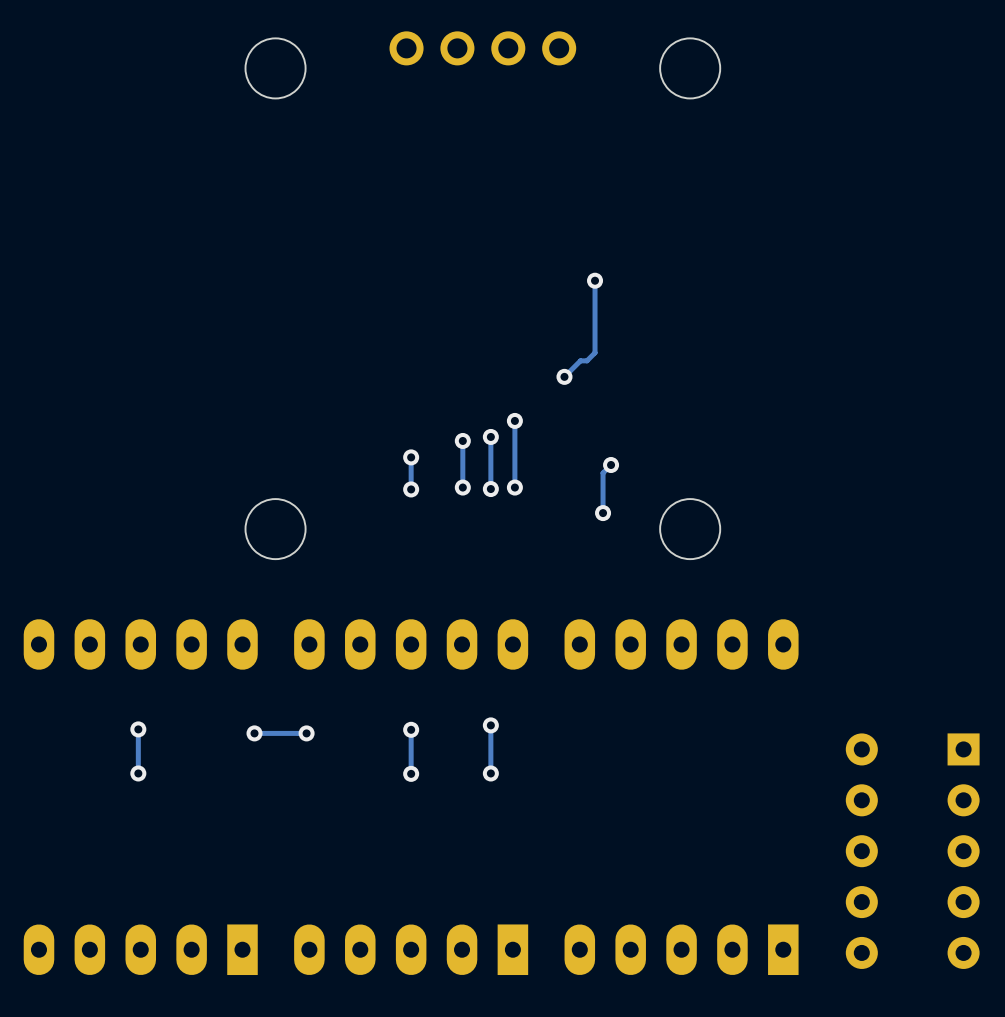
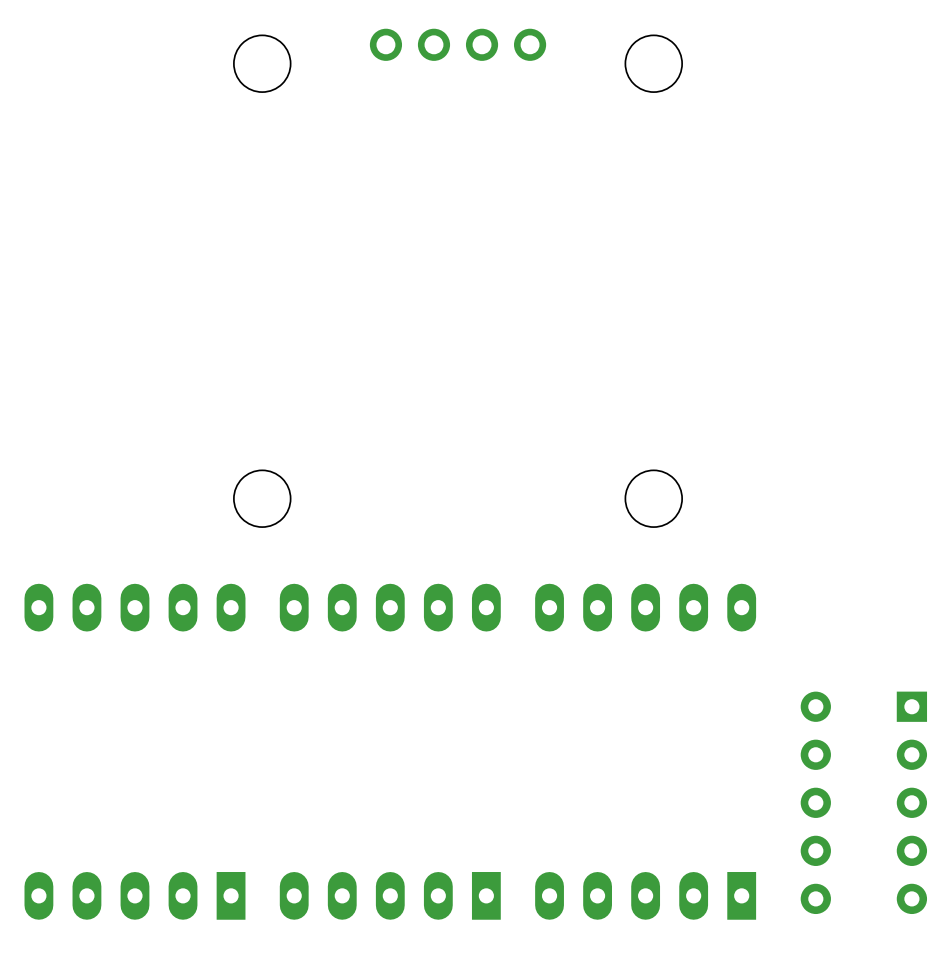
track: (595, 280) (595, 352) (587, 360) (580, 360) (564, 376) -> none
via: (595, 280) -> none
via: (564, 376) -> none
track: (514, 420) (514, 487) -> none
via: (514, 420) -> none
track: (490, 436) (490, 489) -> none
via: (490, 436) -> none
track: (462, 440) (462, 487) -> none
via: (462, 440) -> none
track: (411, 457) (411, 489) -> none
via: (411, 457) -> none
track: (611, 465) (603, 473) (603, 513) -> none
via: (611, 465) -> none
via: (462, 487) -> none
via: (514, 487) -> none
via: (411, 489) -> none
via: (490, 489) -> none
via: (603, 513) -> none
track: (490, 725) (490, 773) -> none
via: (490, 725) -> none
track: (138, 729) (138, 773) -> none
via: (138, 729) -> none
track: (411, 729) (411, 773) -> none
via: (411, 729) -> none
via: (254, 733) -> none
track: (306, 733) (254, 733) -> none
via: (306, 733) -> none
via: (138, 773) -> none
via: (411, 773) -> none
via: (490, 773) -> none

